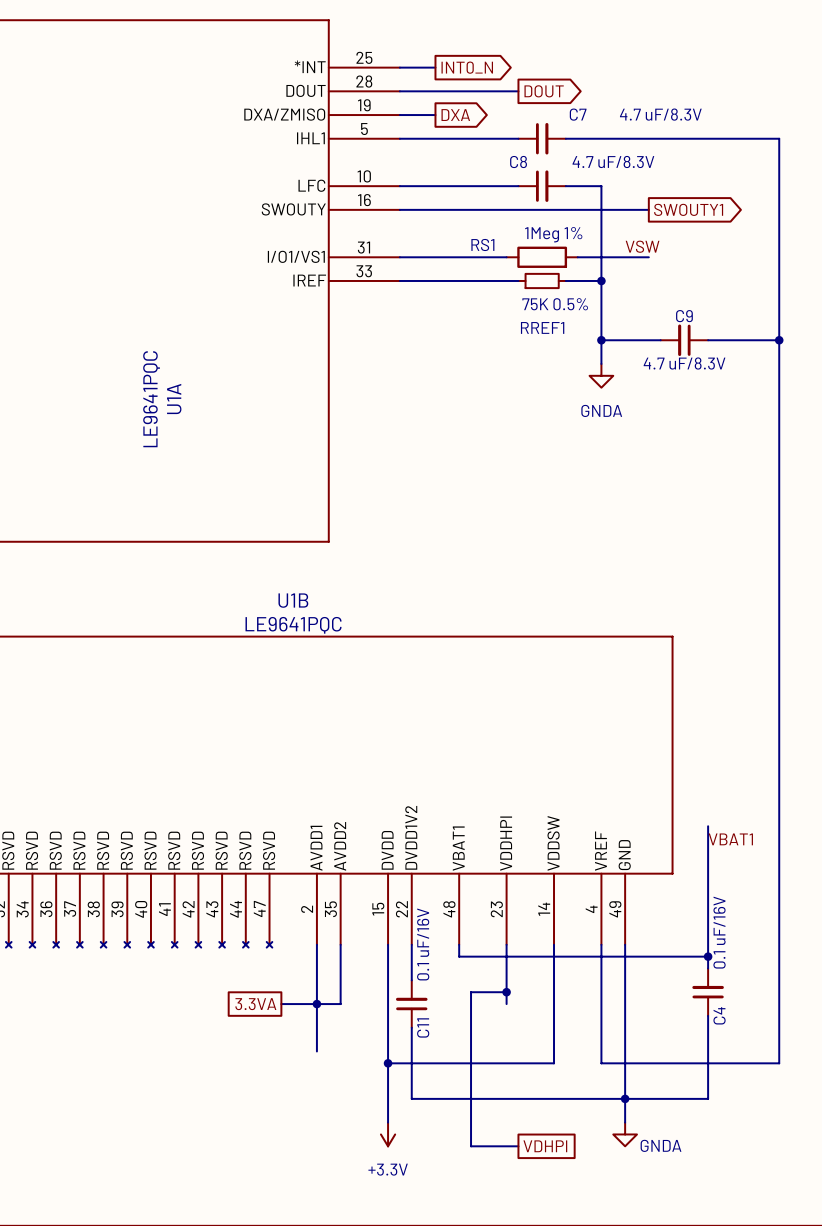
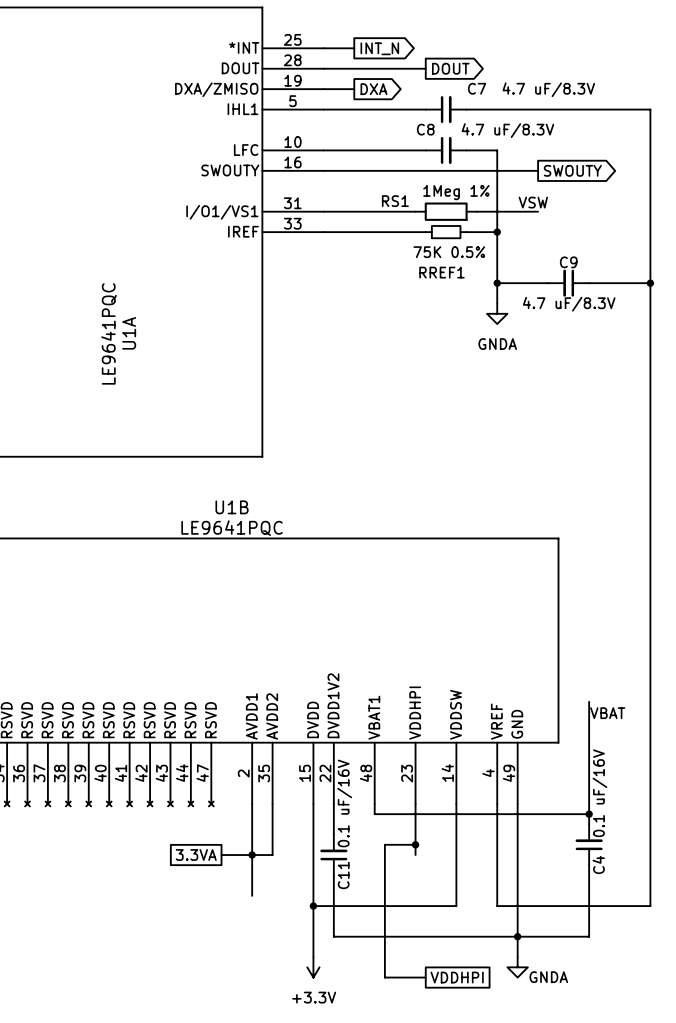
global label: INT0_N (467, 67) -> INT_N (379, 48)
global label: SWOUTY1 (688, 209) -> SWOUTY (572, 170)
label: VBAT1 (730, 839) -> VBAT (607, 713)
global label: VDHPI (545, 1146) -> VDDHPI (457, 977)

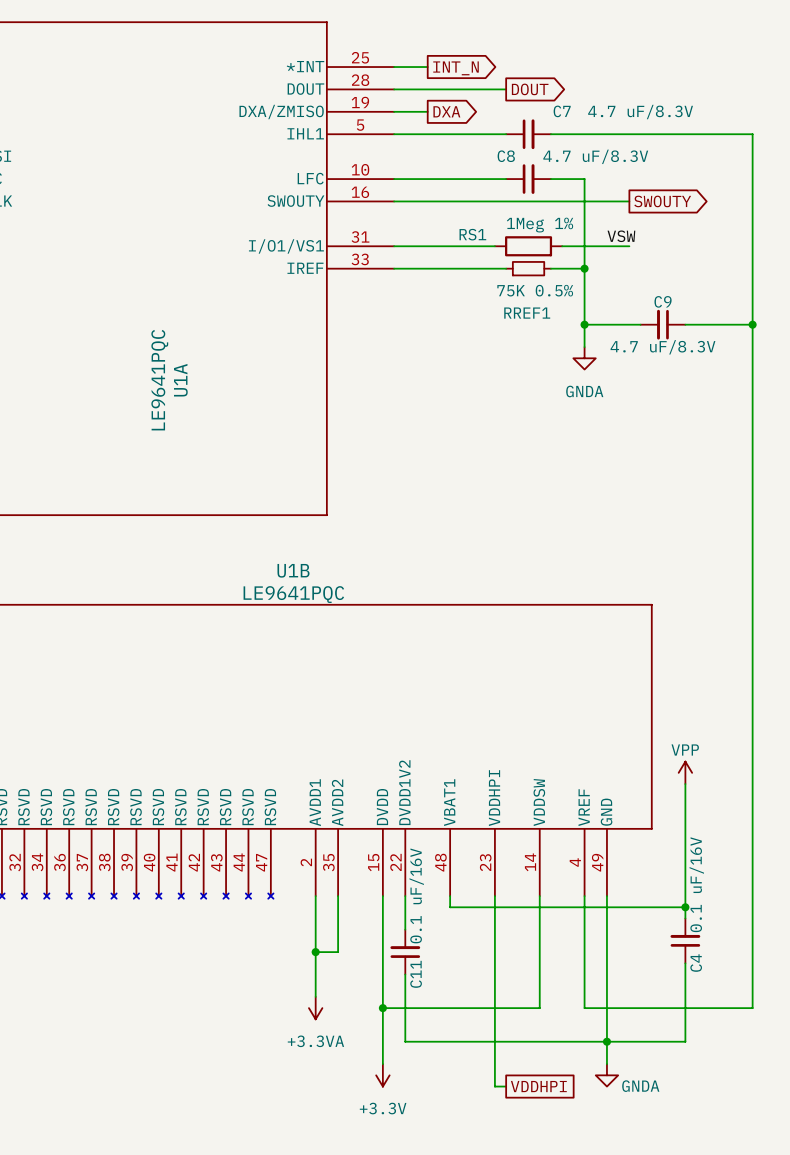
power symbol: none -> VPP (685, 772)
label: VBAT (607, 713) -> none
wire: (415, 844) (384, 844) (384, 977) (415, 977) -> (494, 952) (494, 1086)
junction: (415, 844) -> none
global label: 3.3VA (196, 855) -> none
wire: (221, 855) (252, 855) -> none
power symbol: none -> +3.3VA (315, 1008)

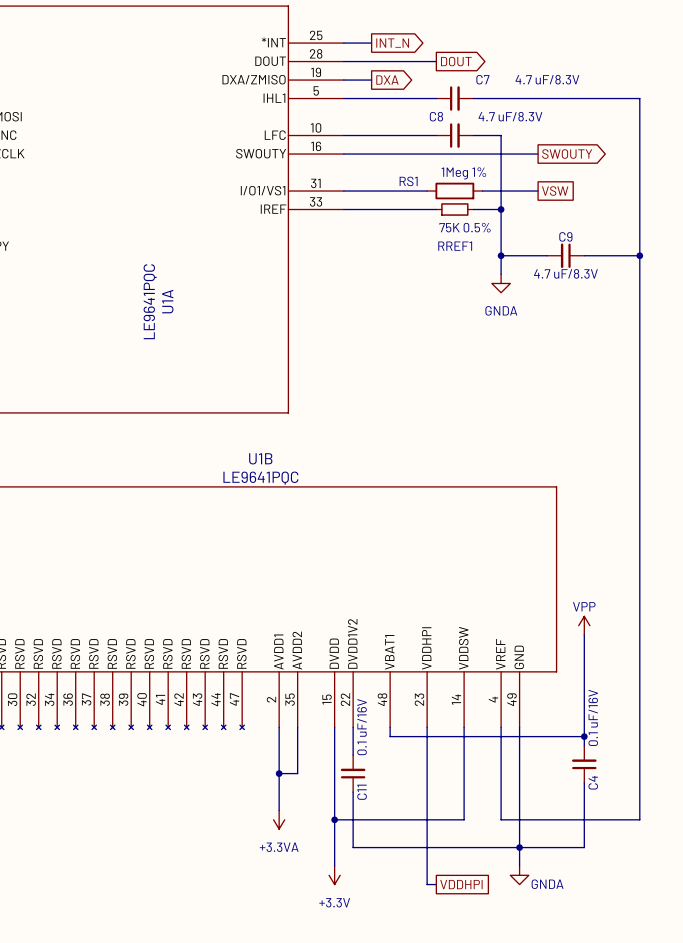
label: VSW (621, 236) -> none
global label: none -> VSW (555, 191)

